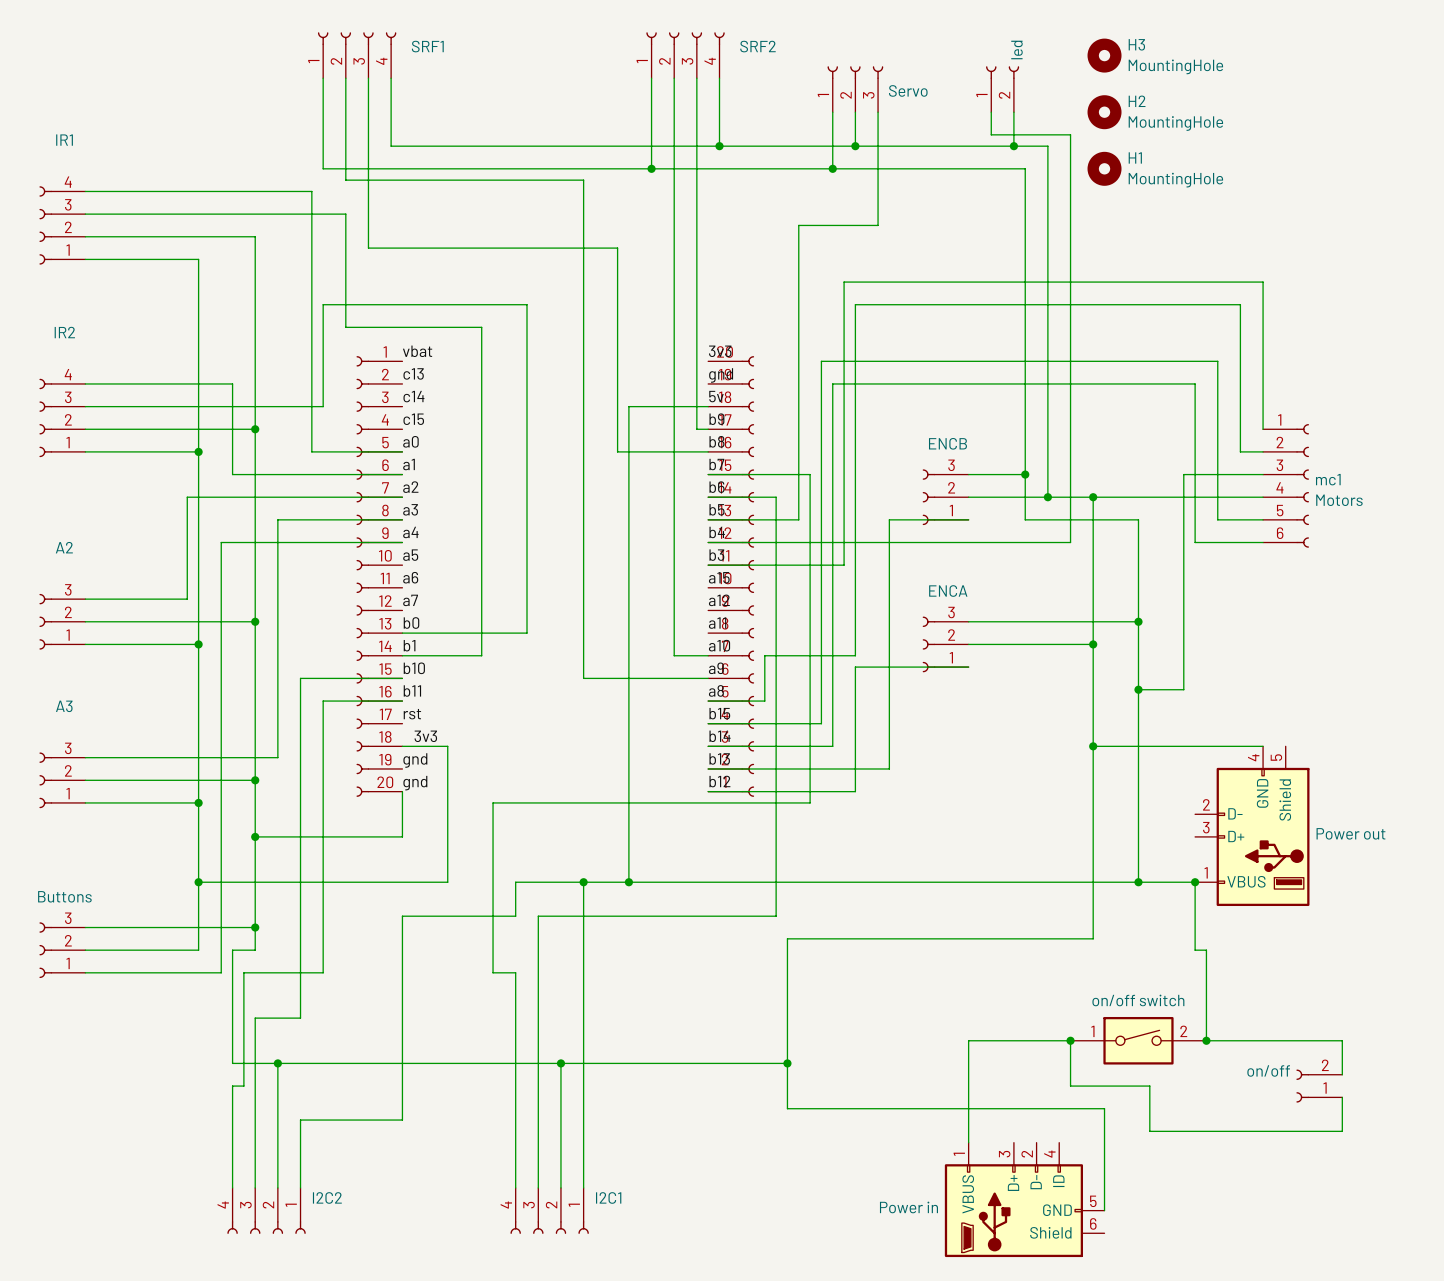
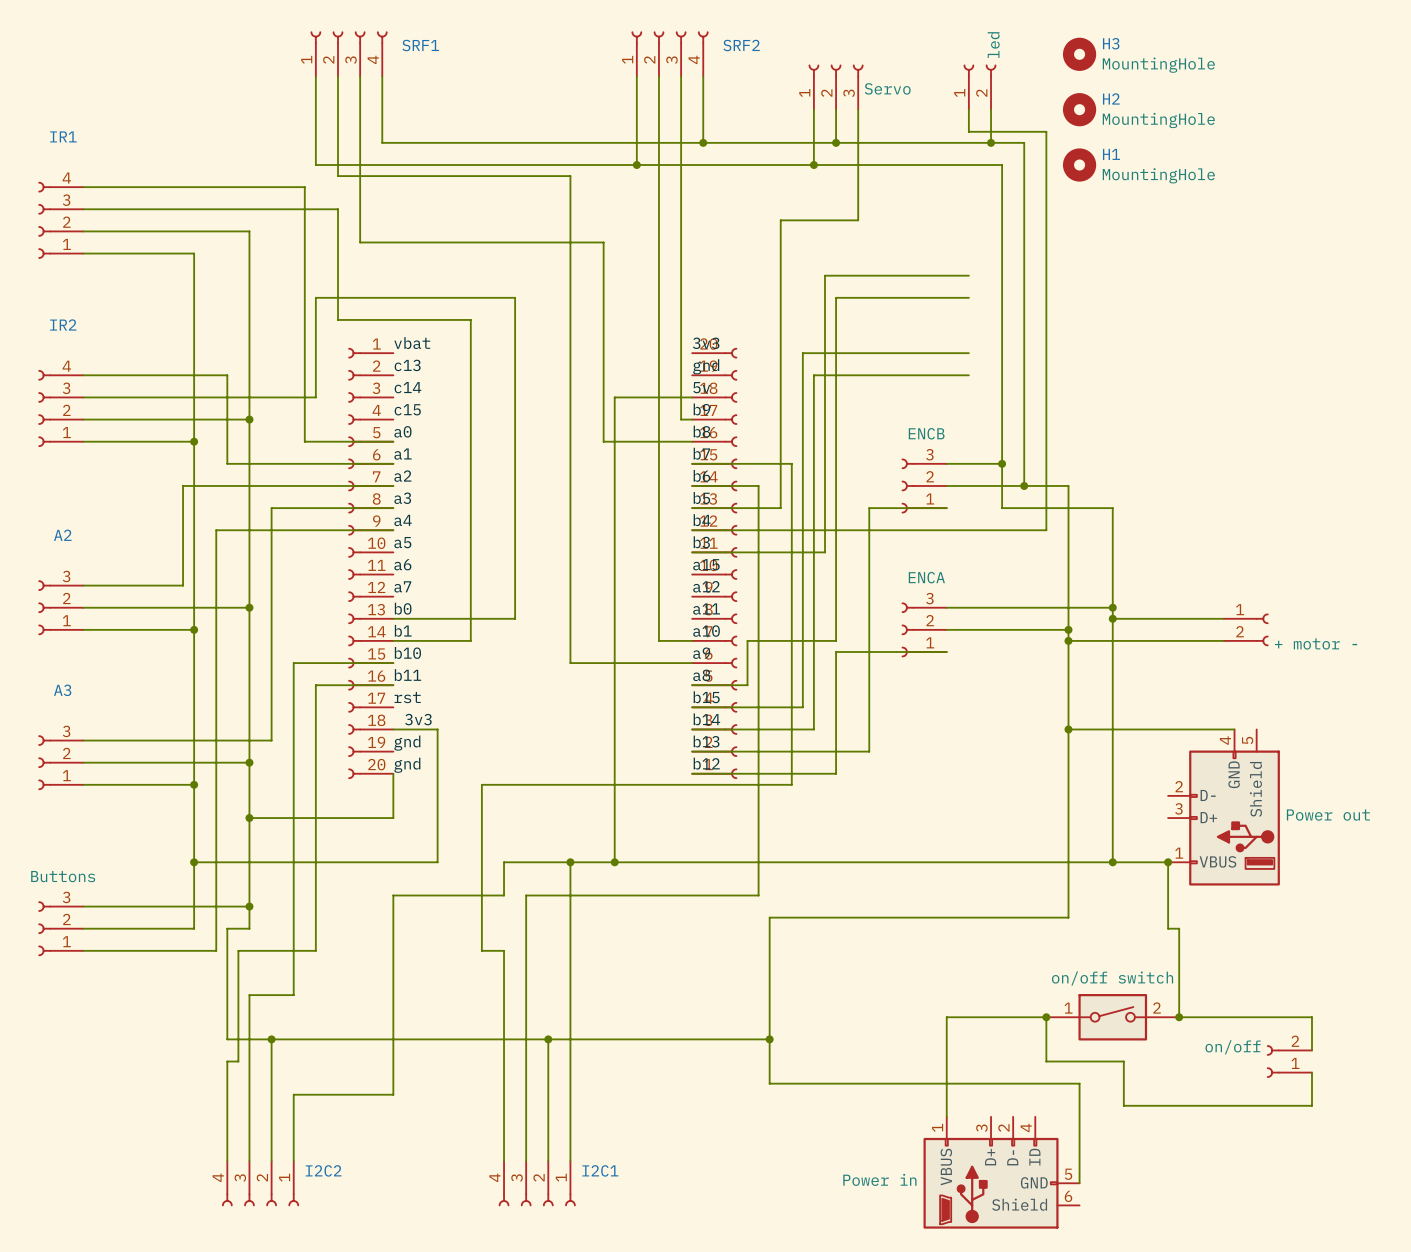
wire: (991, 282) (1263, 282) (1263, 429) -> none
wire: (991, 304) (1240, 304) (1240, 451) (1263, 451) -> none
wire: (991, 361) (1217, 361) (1217, 519) (1263, 519) -> none
wire: (991, 383) (1195, 383) (1195, 542) (1263, 542) -> none
wire: (1263, 474) (1183, 474) (1183, 689) (1138, 689) -> none
mc1: Motors (1286, 485) -> none
wire: (1093, 497) (1263, 497) -> none
junction: (1093, 497) -> none
wire: none -> (1112, 618) (1223, 618)
junction: none -> (1112, 618)
part: none -> + motor - (1245, 629)
wire: none -> (1068, 640) (1223, 640)
junction: none -> (1068, 640)
junction: (1138, 689) -> none

